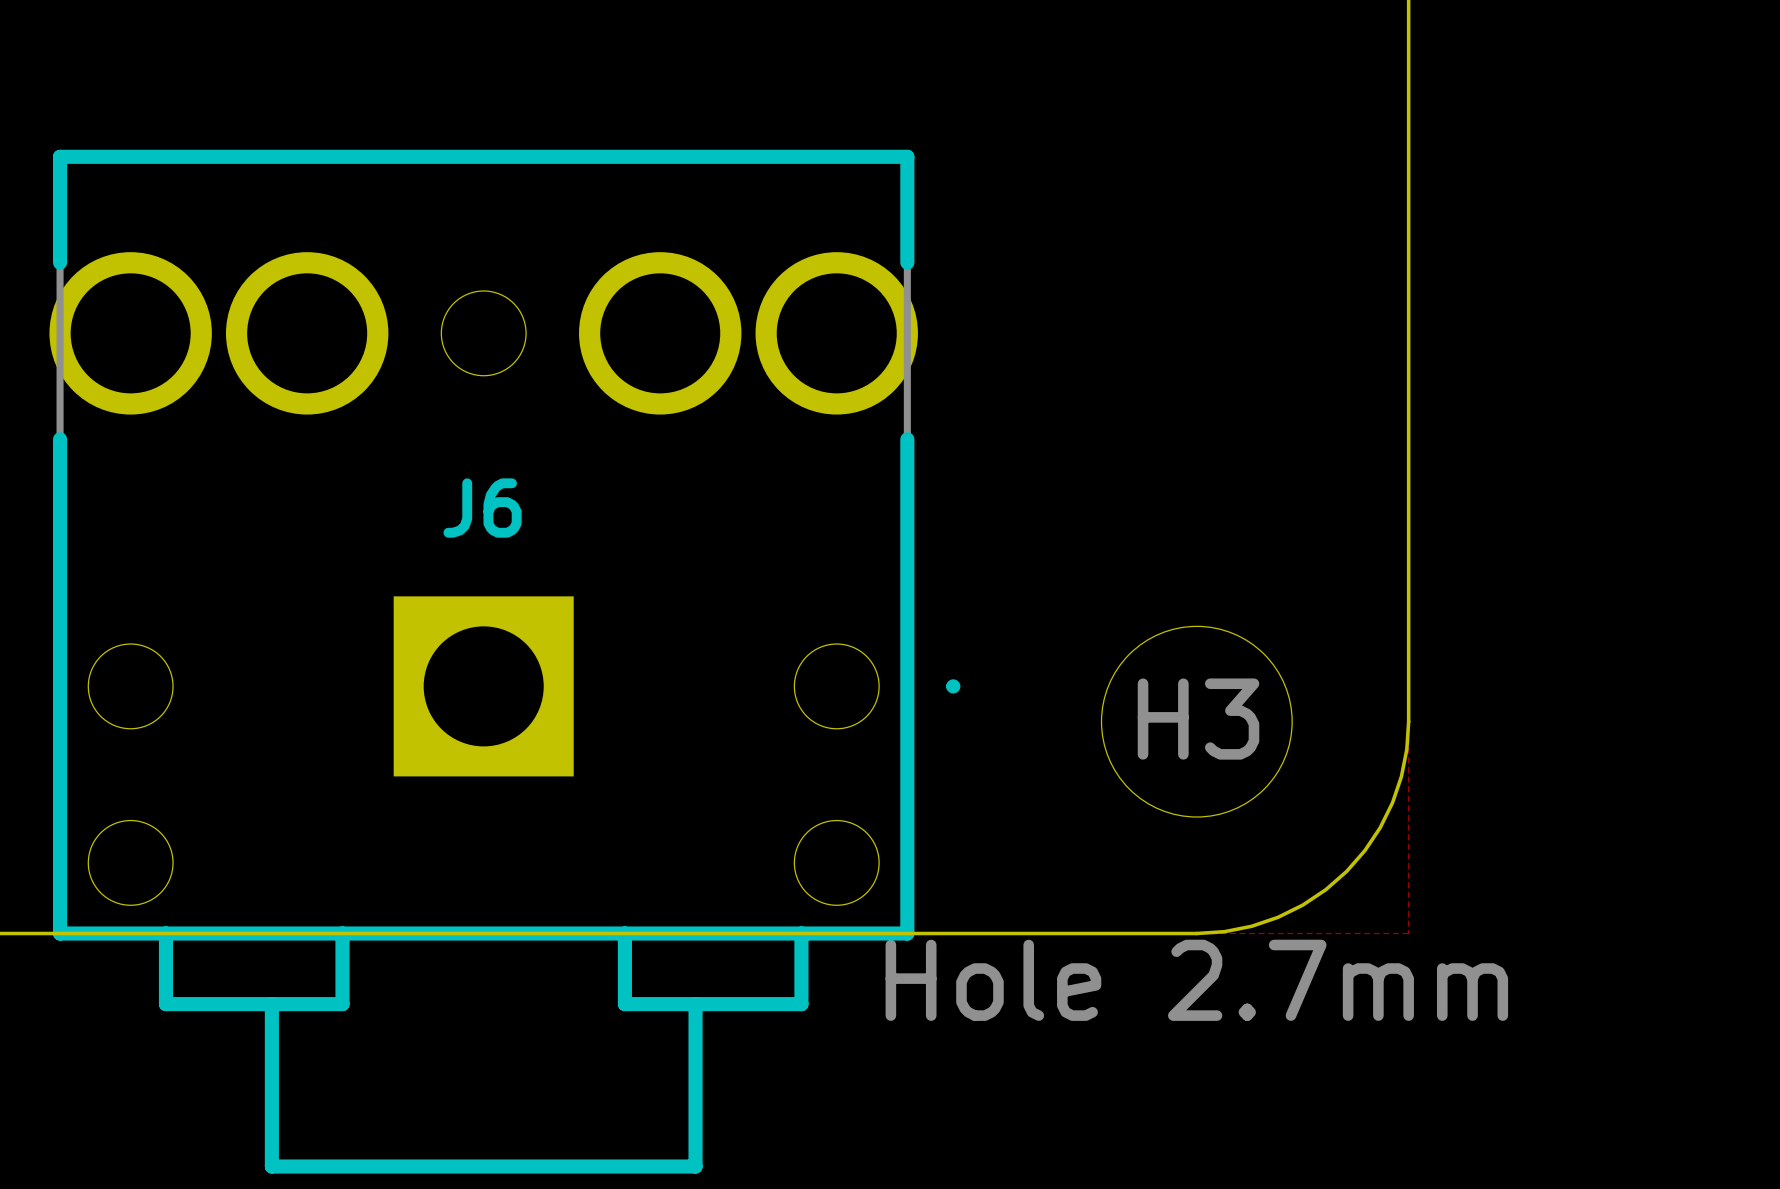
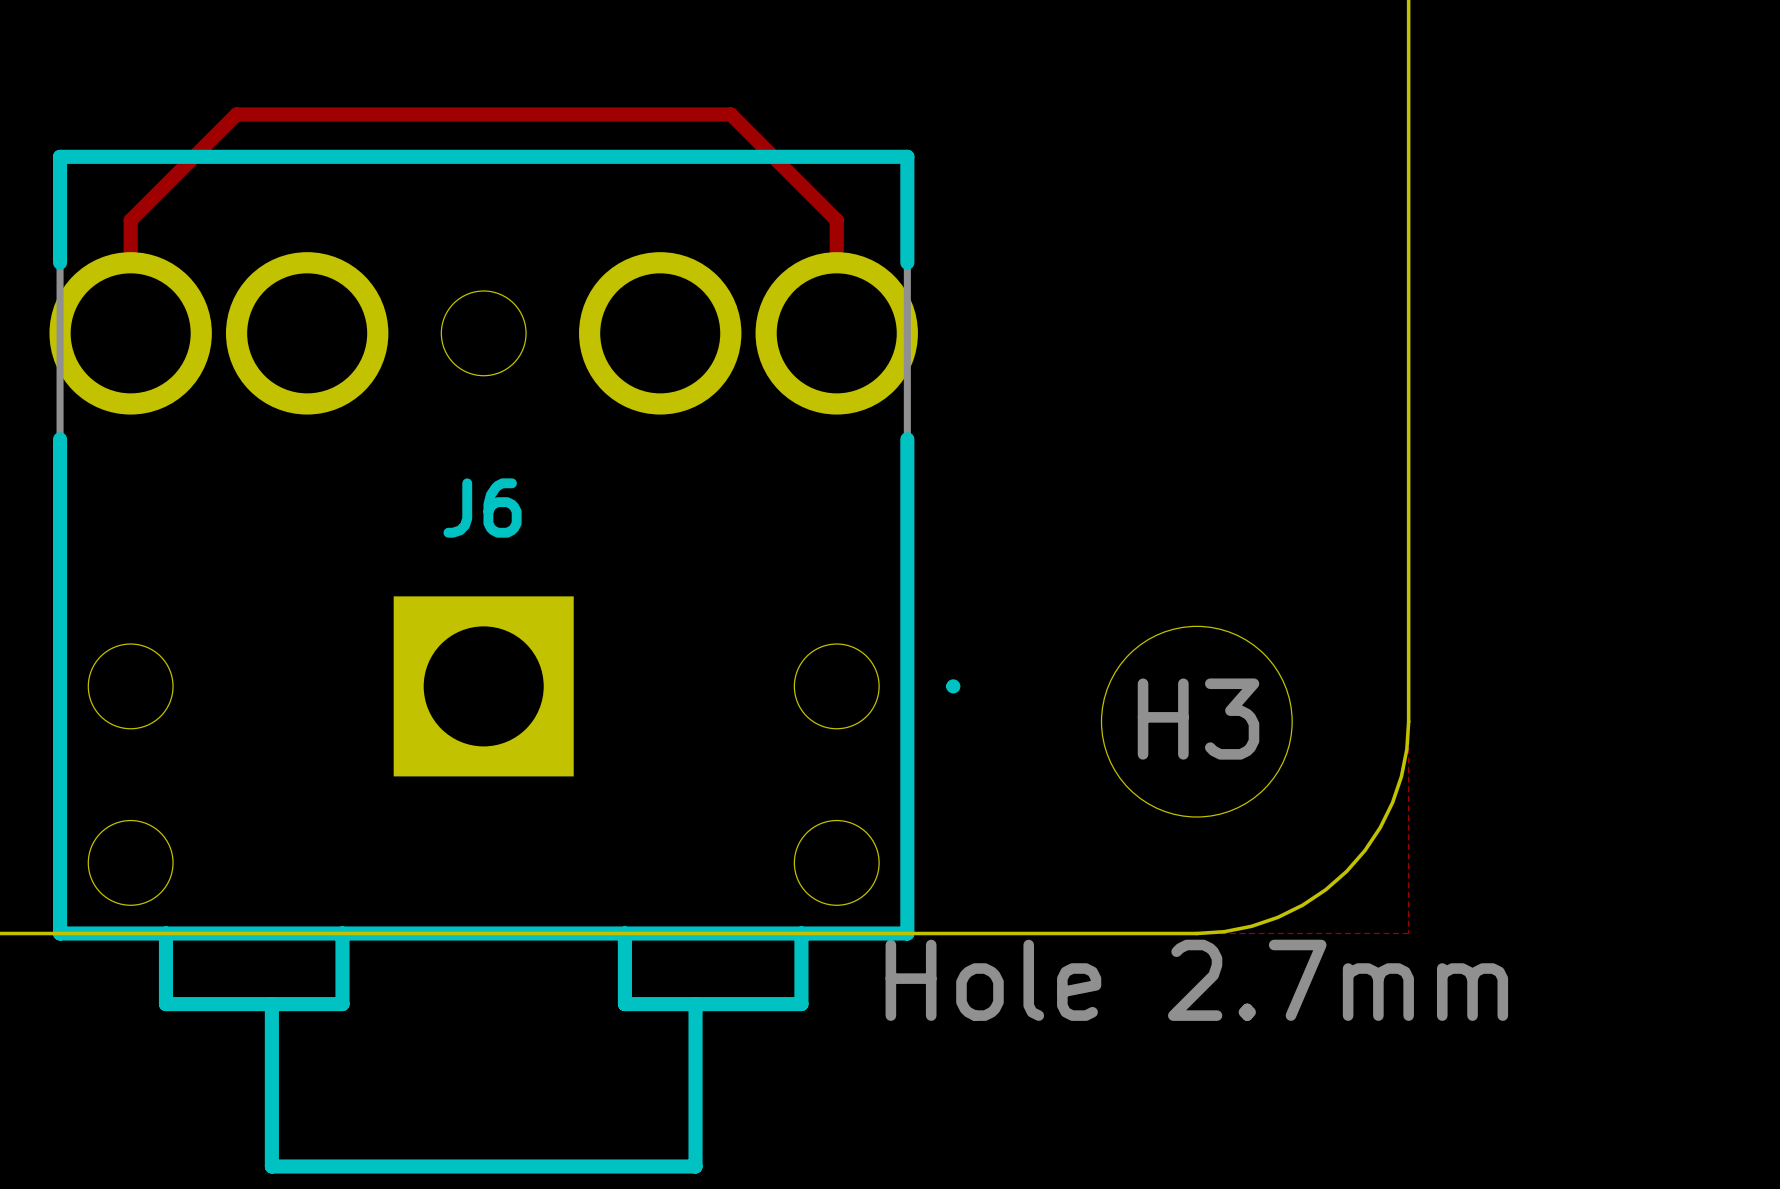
track: none -> (130, 333) (130, 220) (236, 114) (730, 114) (836, 220) (836, 333)

